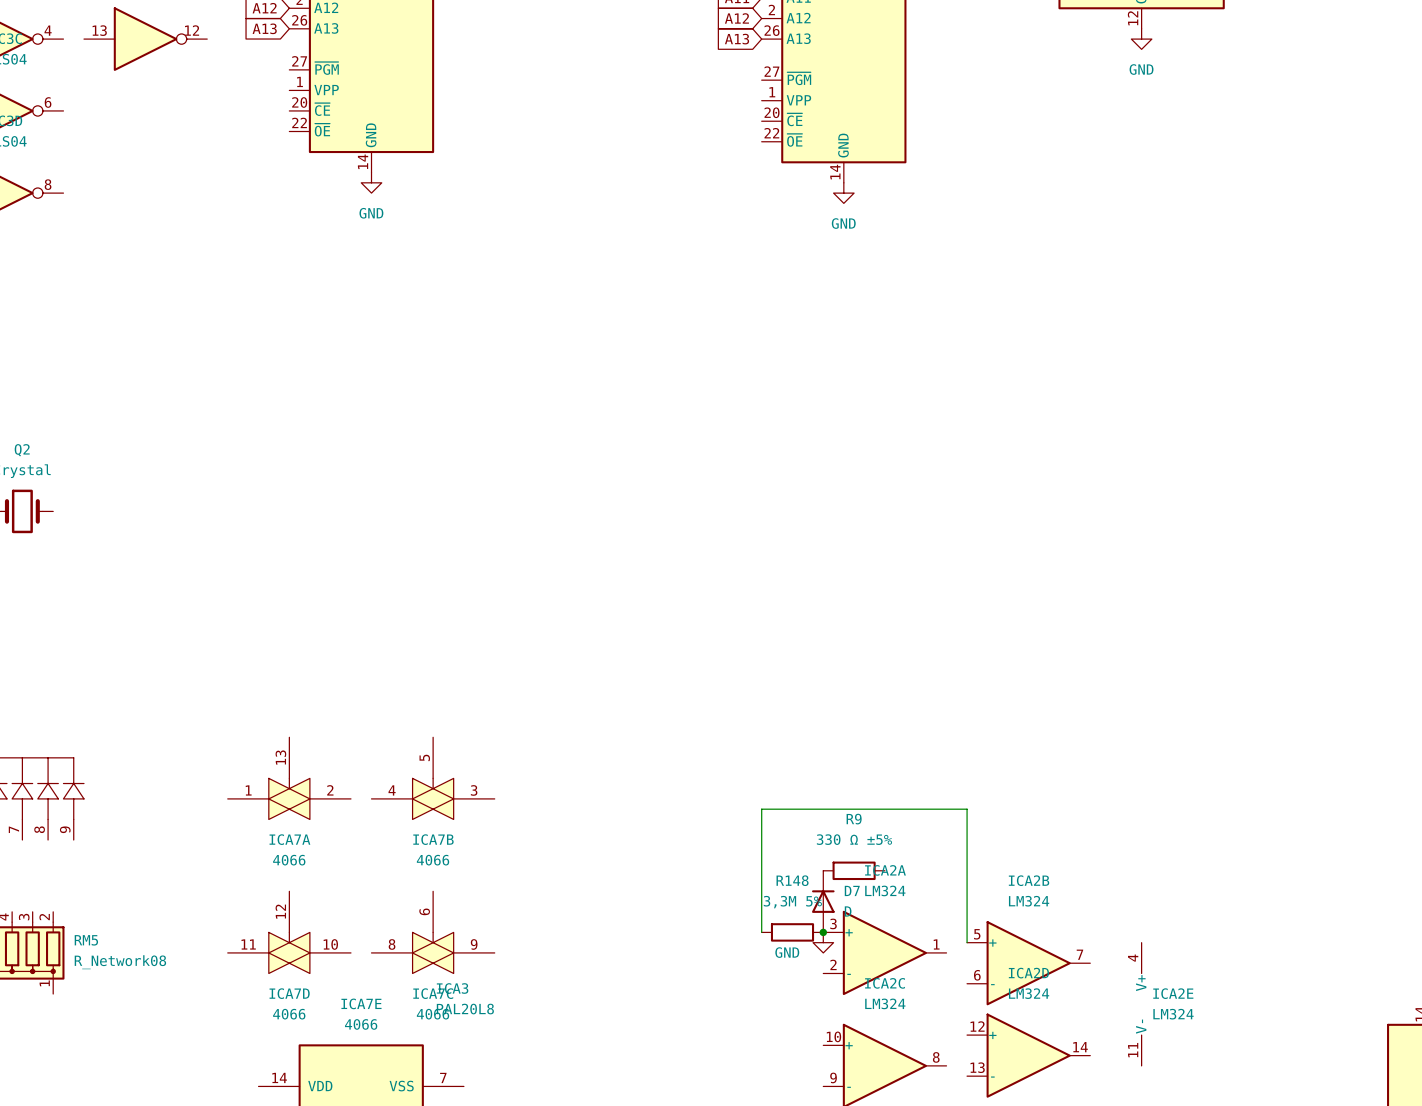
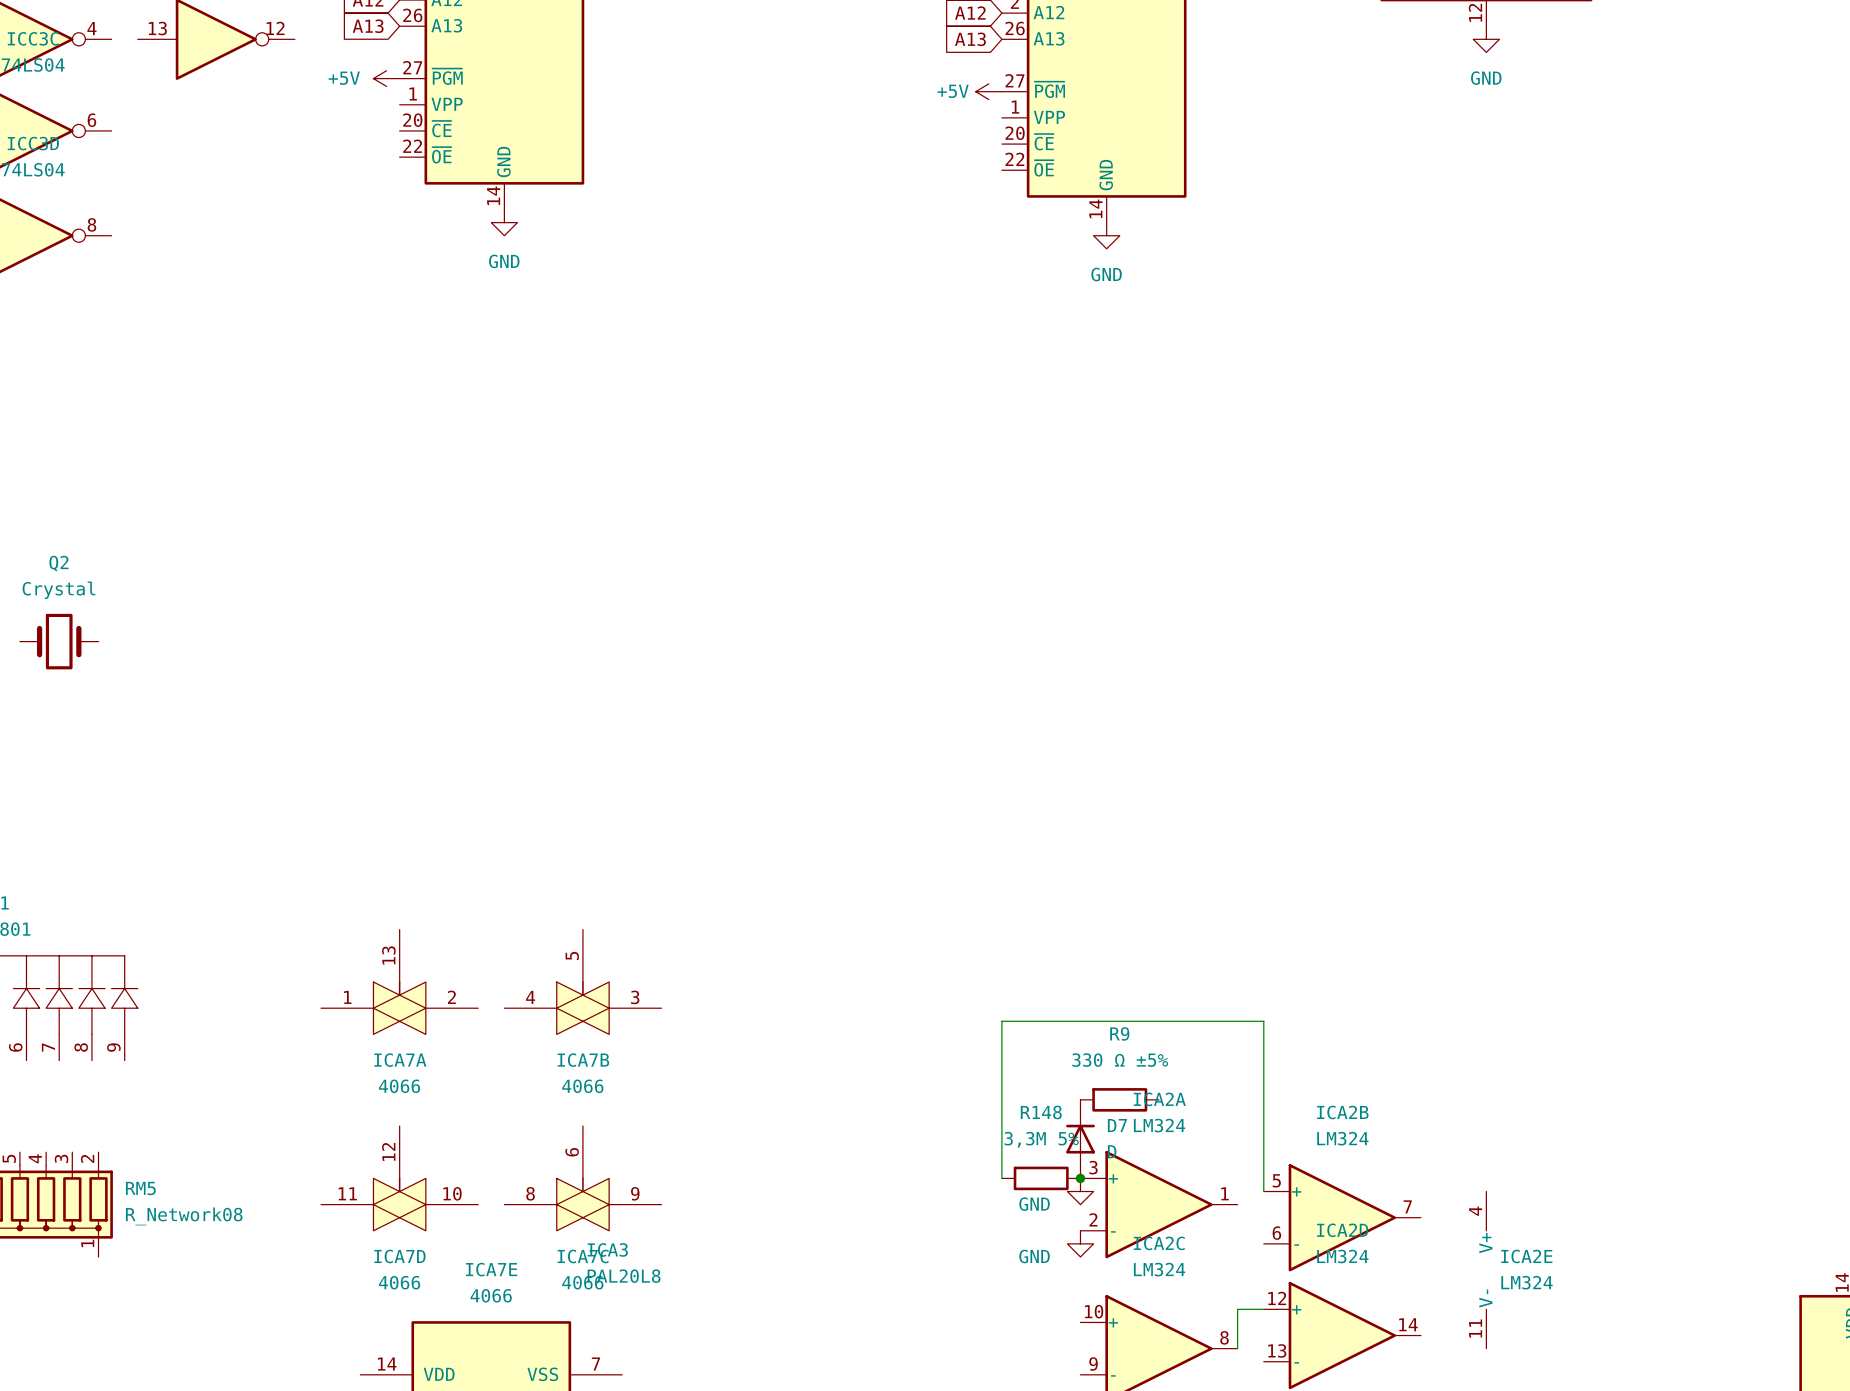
power symbol: none -> +5V (386, 78)
power symbol: none -> +5V (988, 91)
power symbol: none -> GND (1080, 1243)
wire: none -> (1263, 1309) (1237, 1309) (1237, 1348)

